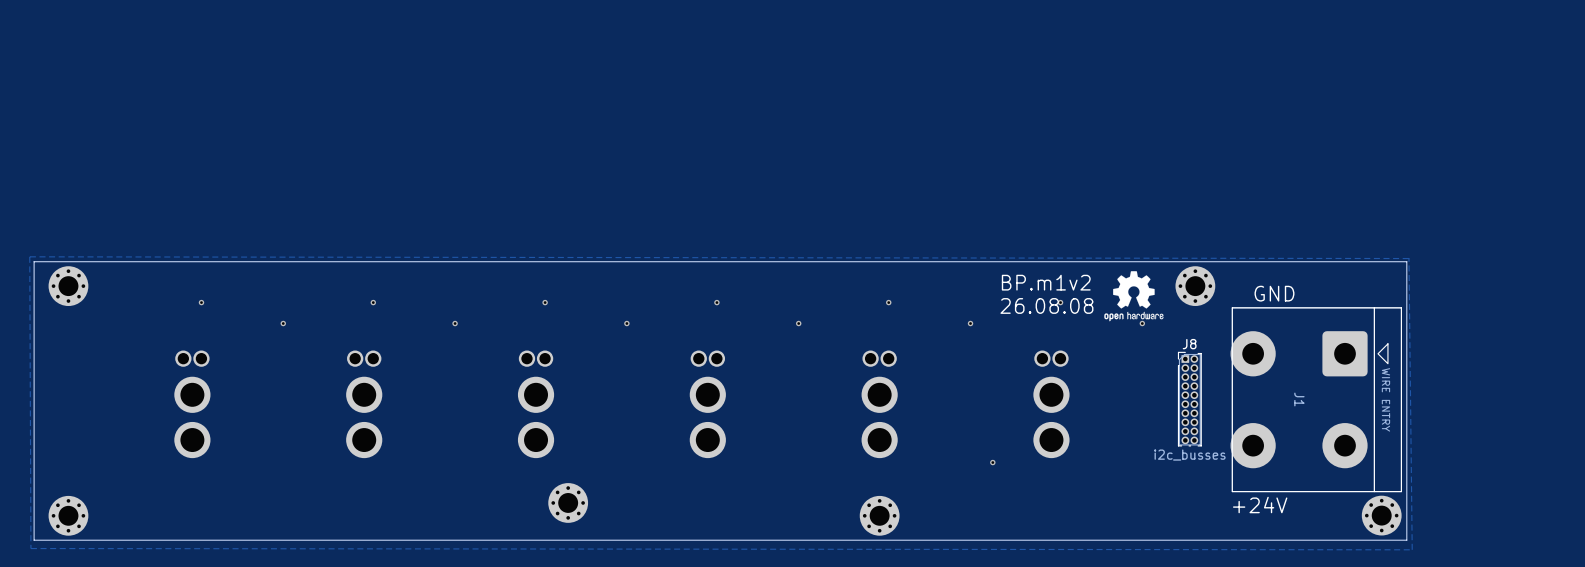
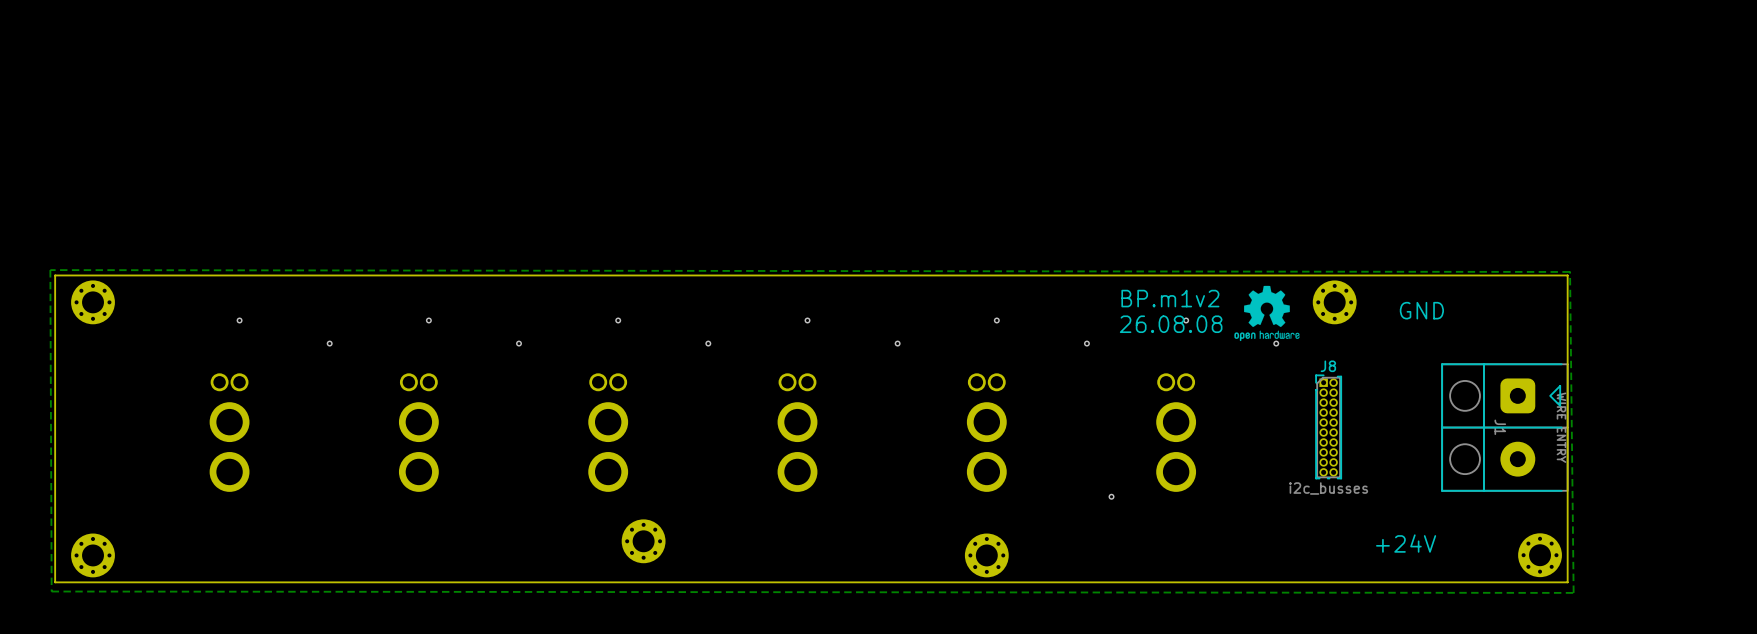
J1 footprint: [1230, 307, 1402, 493] -> [1441, 363, 1569, 492]

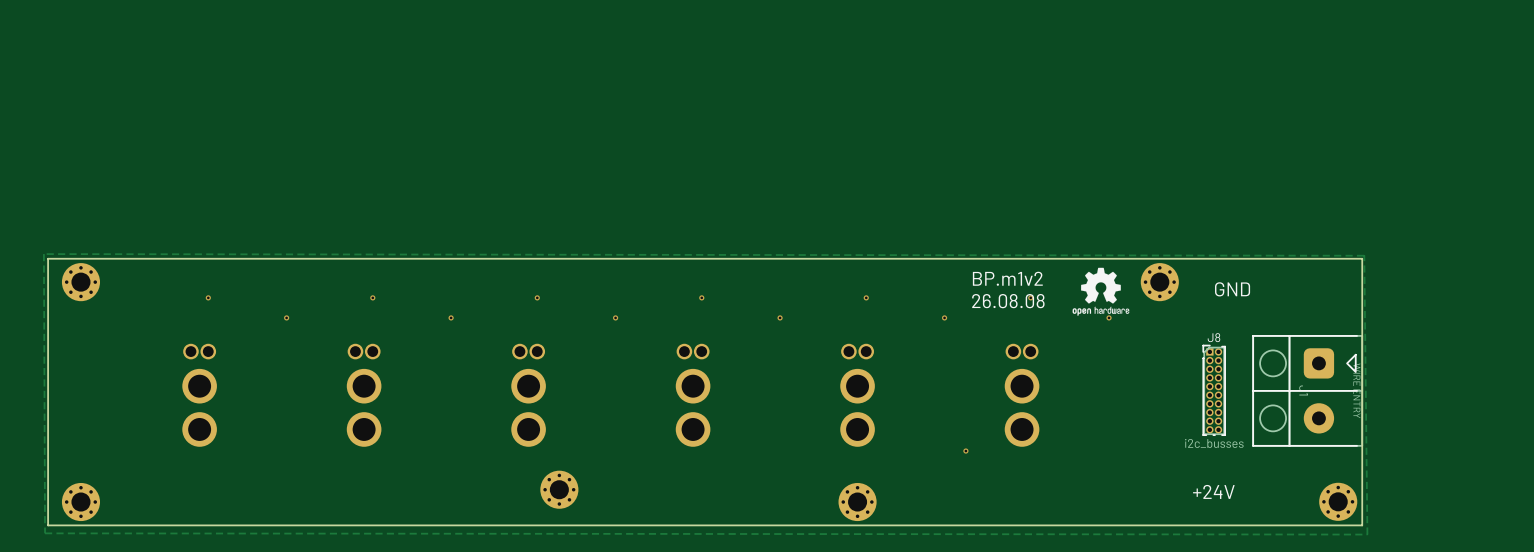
J8 position: (1328, 426) -> (1214, 390)

